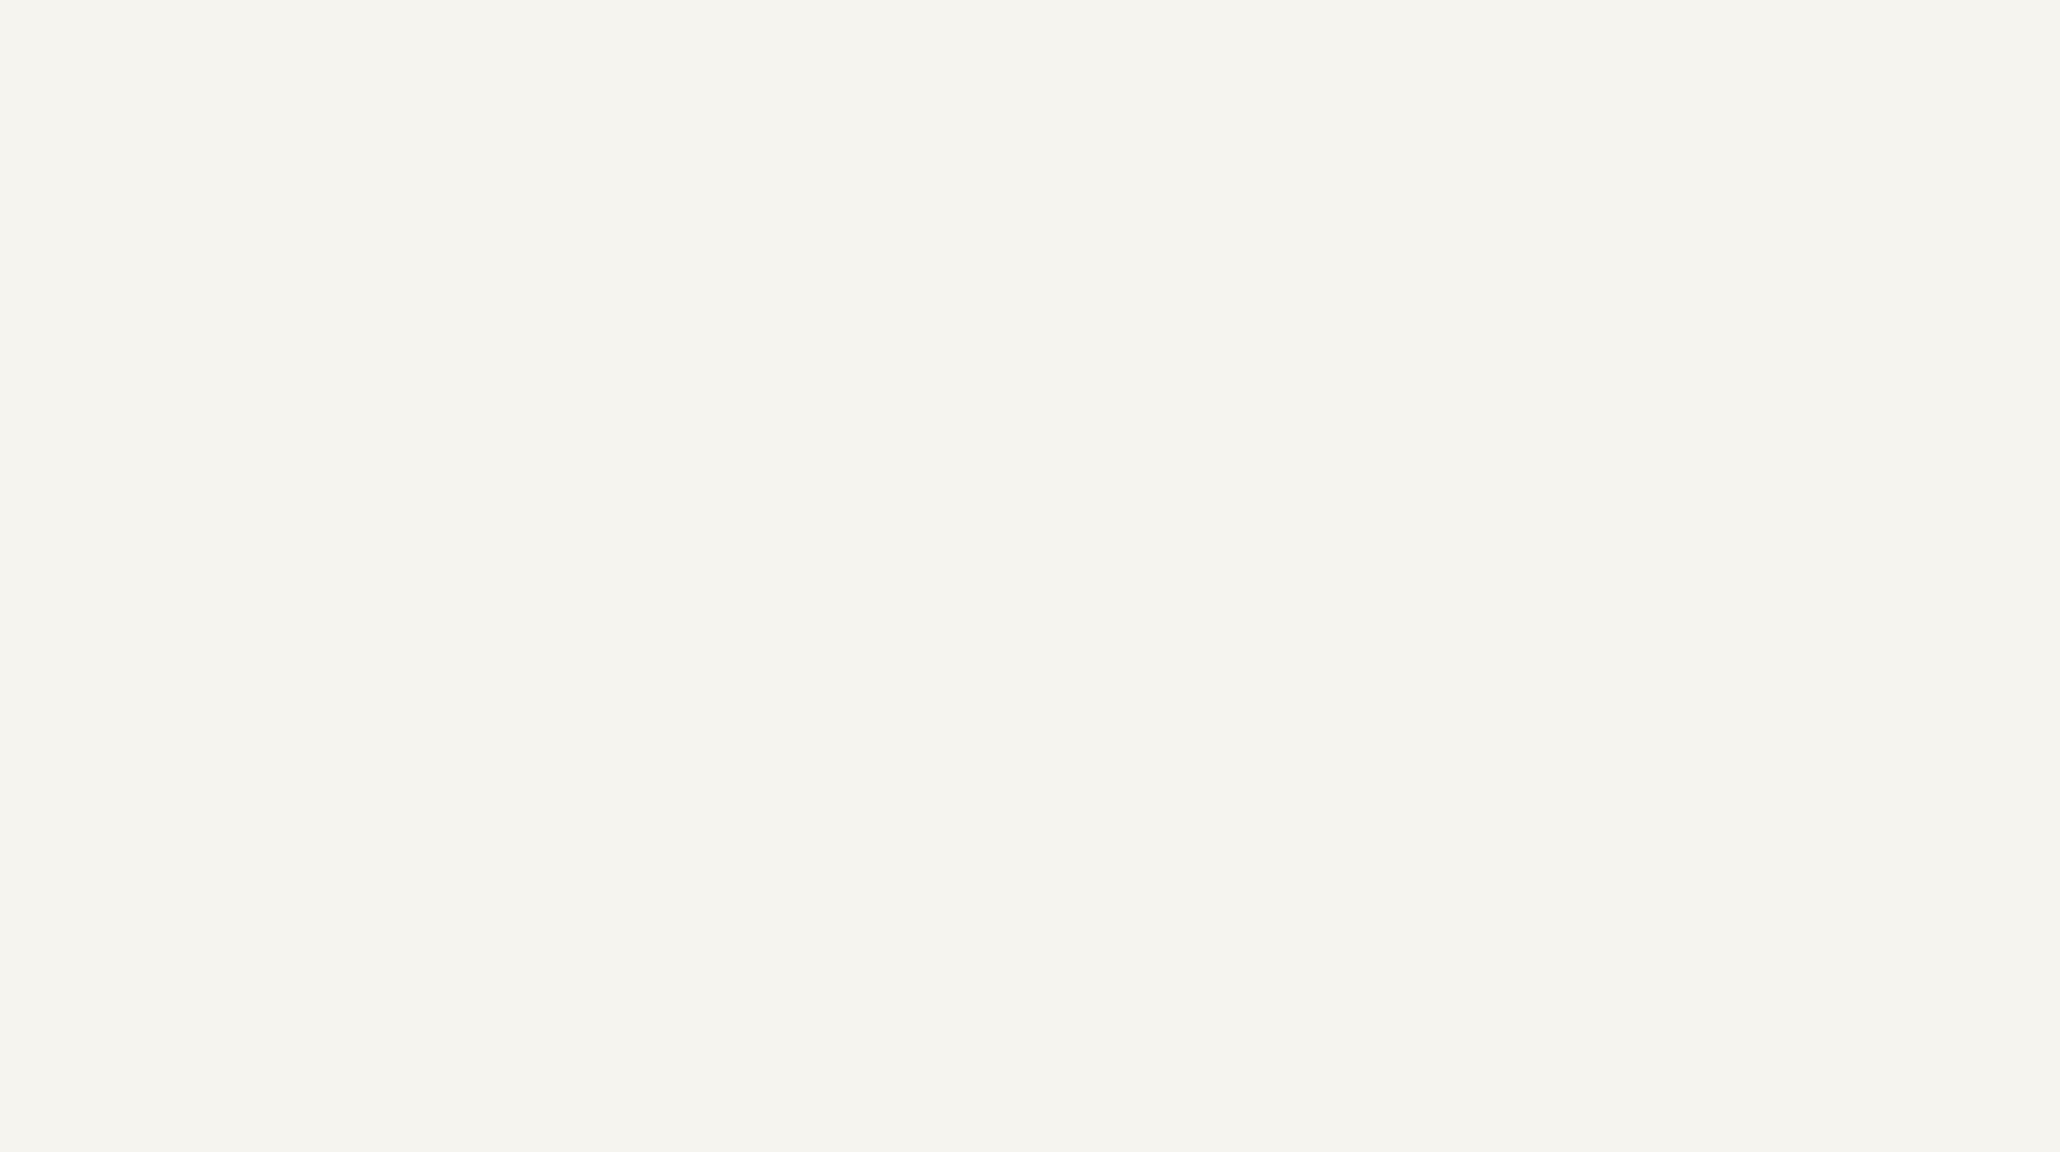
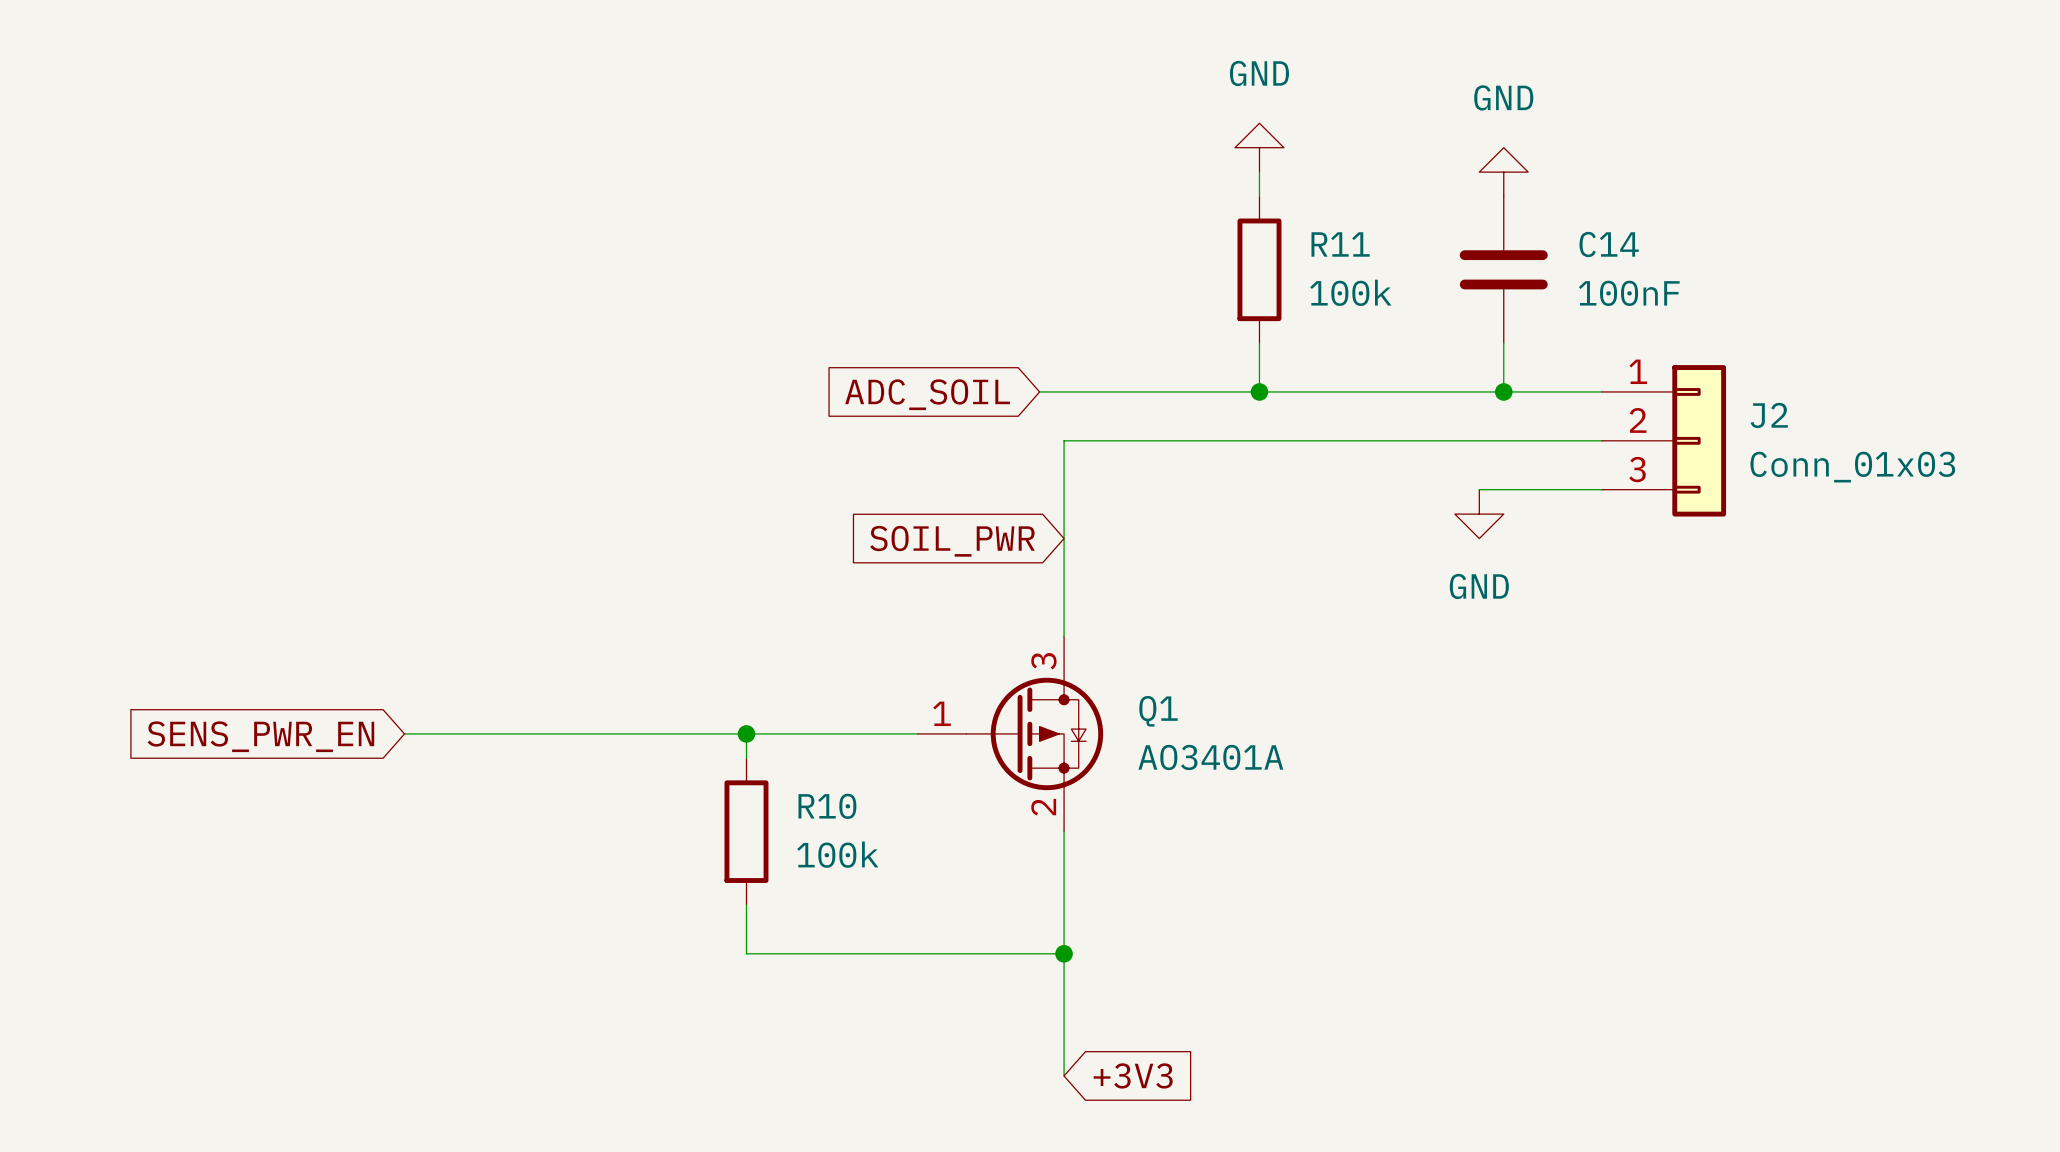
power symbol: none -> GND (1259, 147)
wire: none -> (1259, 172) (1259, 196)
power symbol: none -> GND (1503, 172)
R11: none -> 100k (1259, 269)
C14: none -> 100nF (1503, 269)
wire: none -> (1259, 343) (1259, 391)
wire: none -> (1503, 343) (1503, 391)
wire: none -> (1039, 391) (1601, 391)
junction: none -> (1259, 391)
junction: none -> (1503, 391)
global label: none -> ADC_SOIL (927, 394)
wire: none -> (1601, 440) (1064, 440) (1064, 636)
J2: none -> Conn_01x03 (1663, 440)
wire: none -> (1479, 489) (1601, 489)
power symbol: none -> GND (1479, 514)
global label: none -> SOIL_PWR (952, 541)
wire: none -> (404, 733) (917, 733)
wire: none -> (746, 733) (746, 758)
junction: none -> (746, 733)
Q1: none -> AO3401A (1010, 733)
global label: none -> SENS_PWR_EN (260, 736)
R10: none -> 100k (746, 831)
wire: none -> (1064, 831) (1064, 1075)
wire: none -> (746, 904) (746, 953) (1064, 953)
junction: none -> (1064, 953)
global label: none -> +3V3 (1133, 1075)

